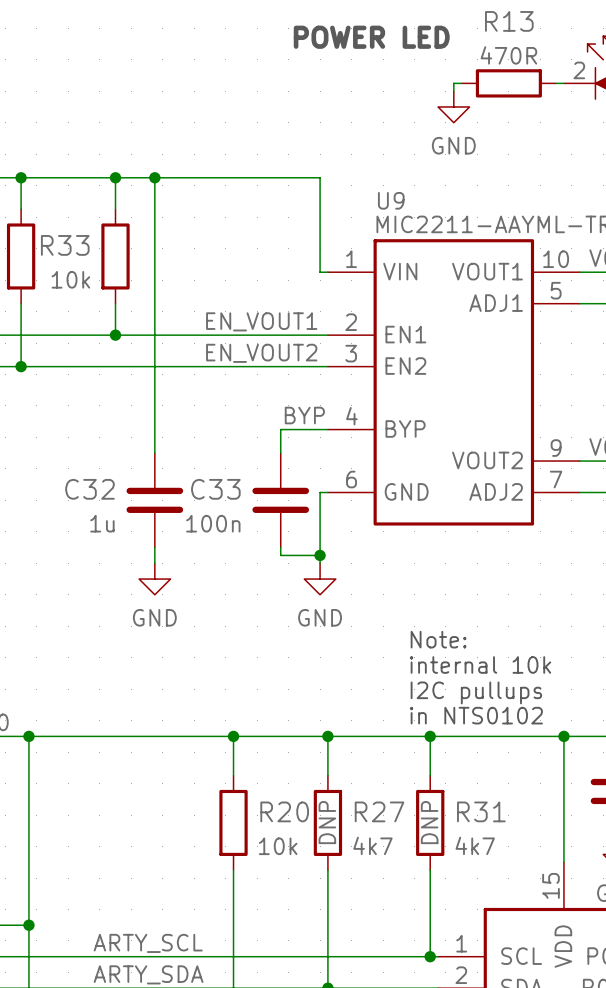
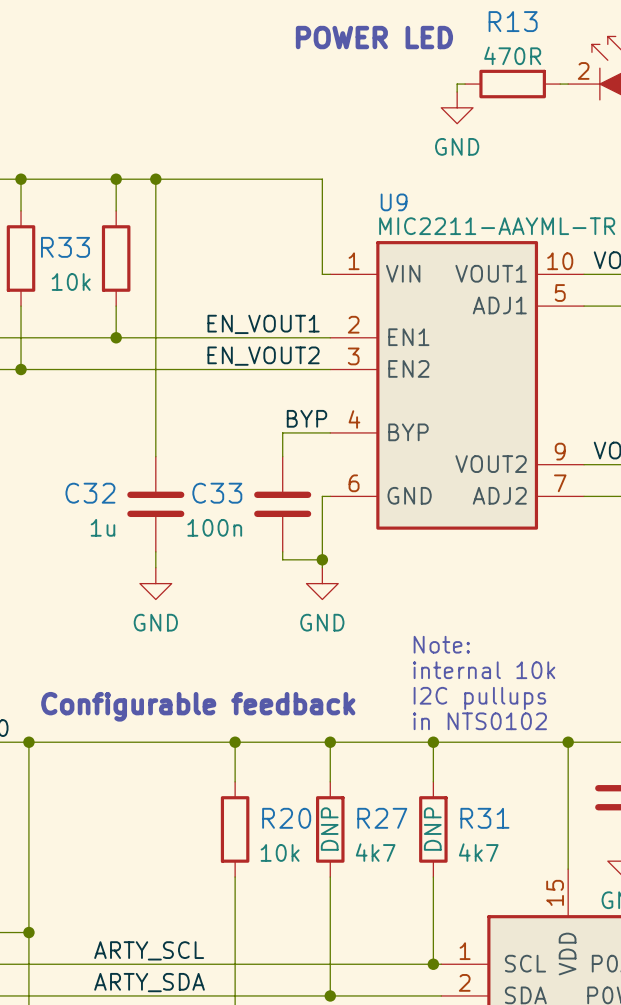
text: none -> Configurable feedback (198, 706)

